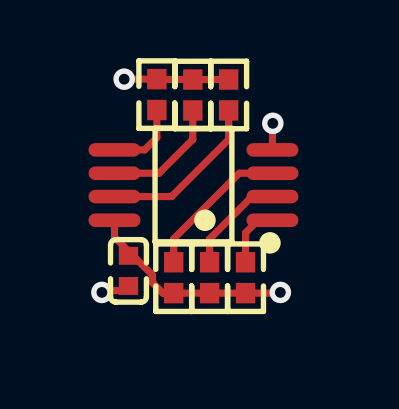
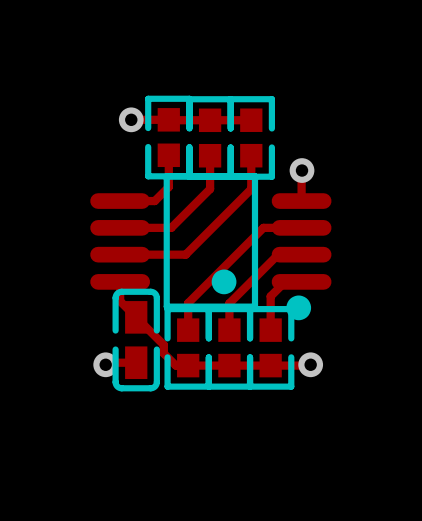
part footprint: [107, 236, 150, 305] -> [112, 288, 160, 392]

